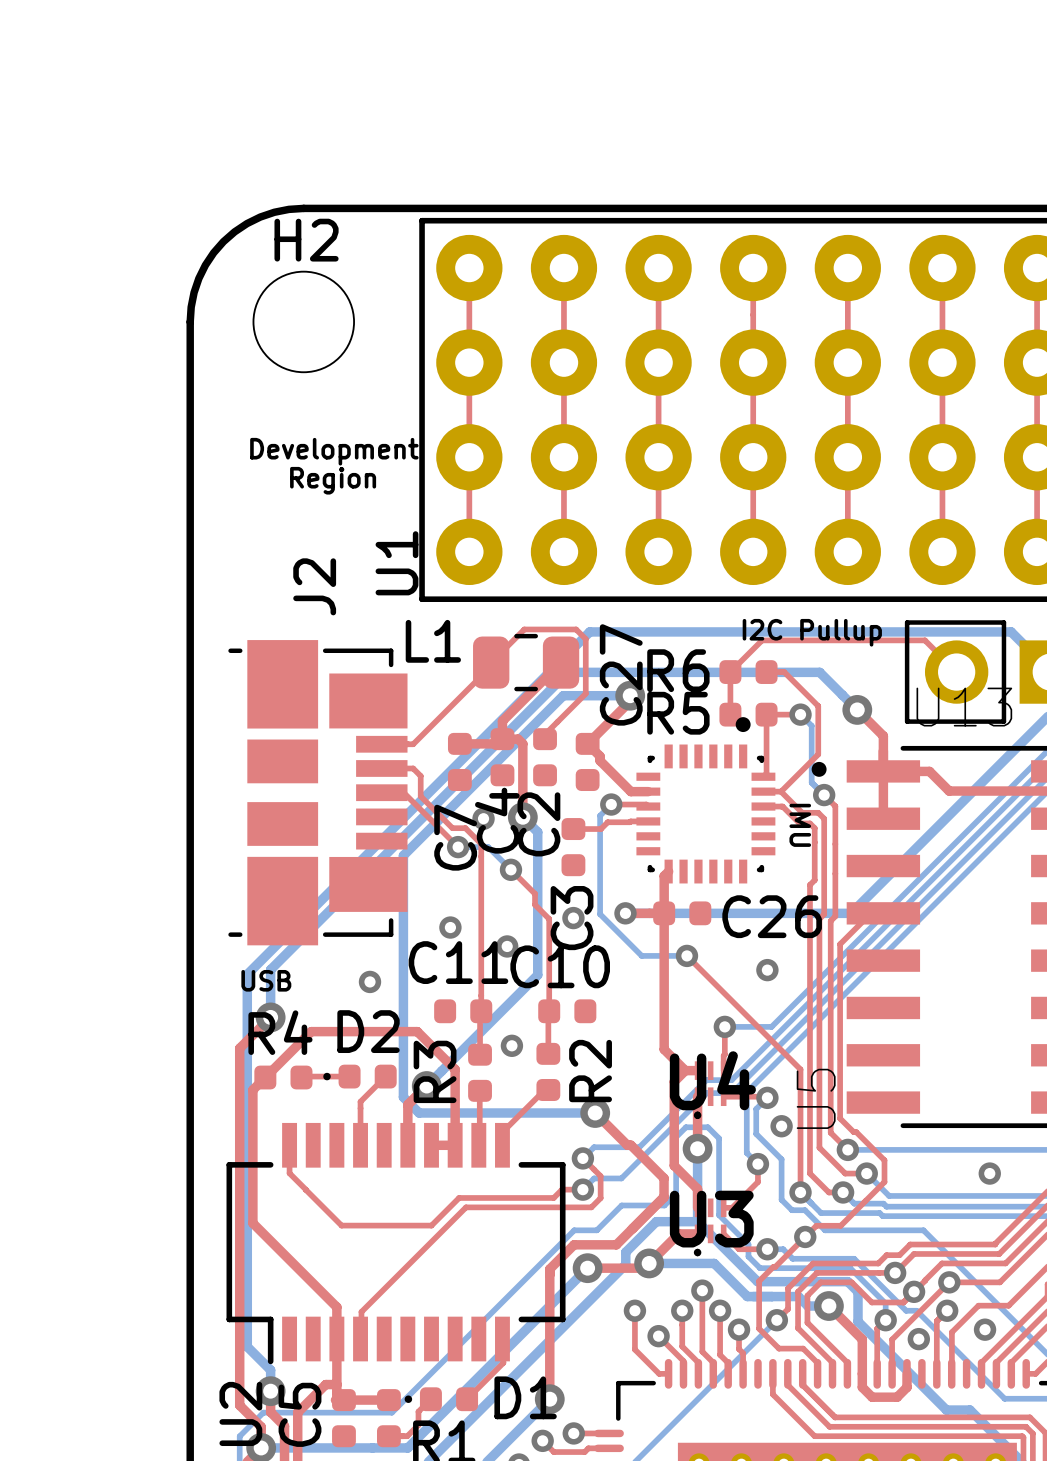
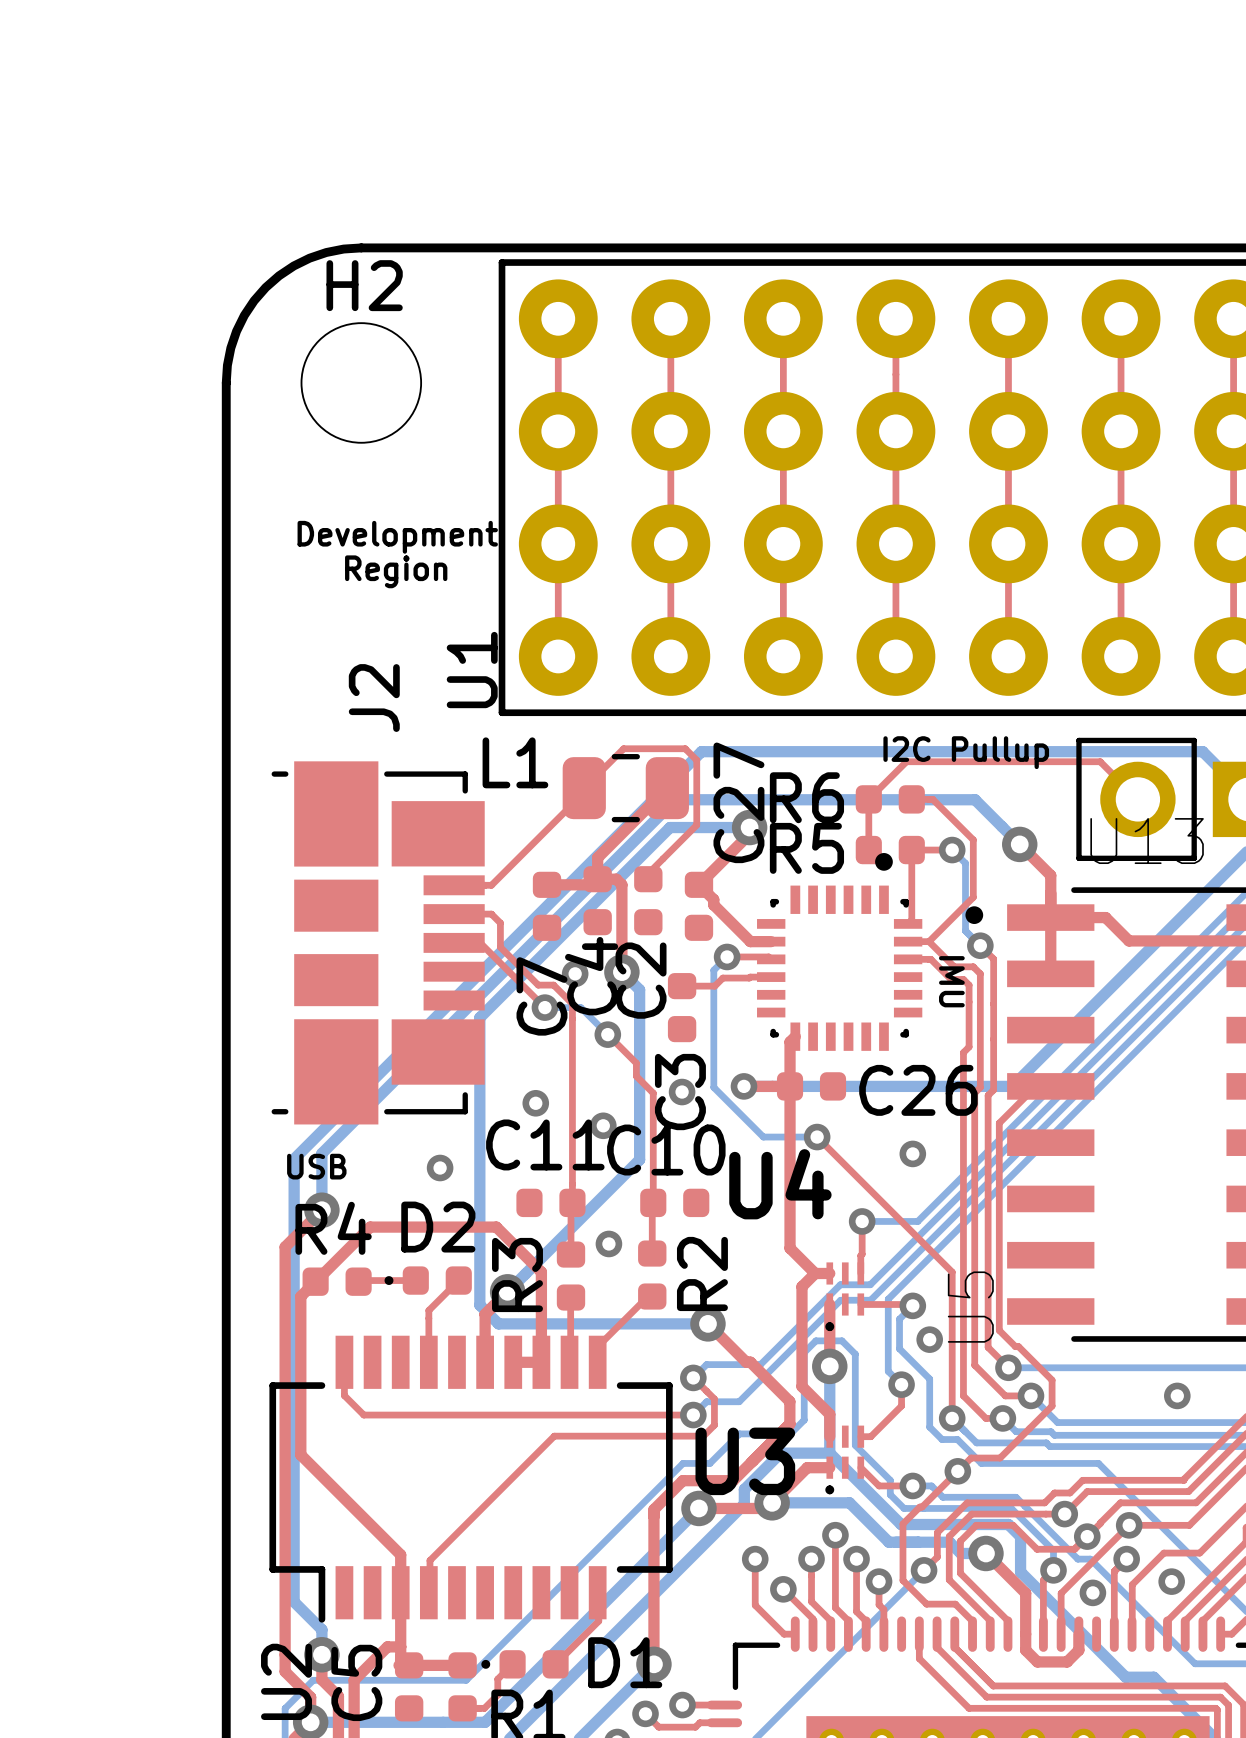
U4 name position: U4 (712, 1080) -> U4 (780, 1184)
top track: (305, 1189) (341, 1225) (431, 1225) (459, 1197) (553, 1197) (562, 1189) -> (363, 1415) (668, 1415)
U3 name position: U3 (711, 1219) -> U3 (745, 1461)

